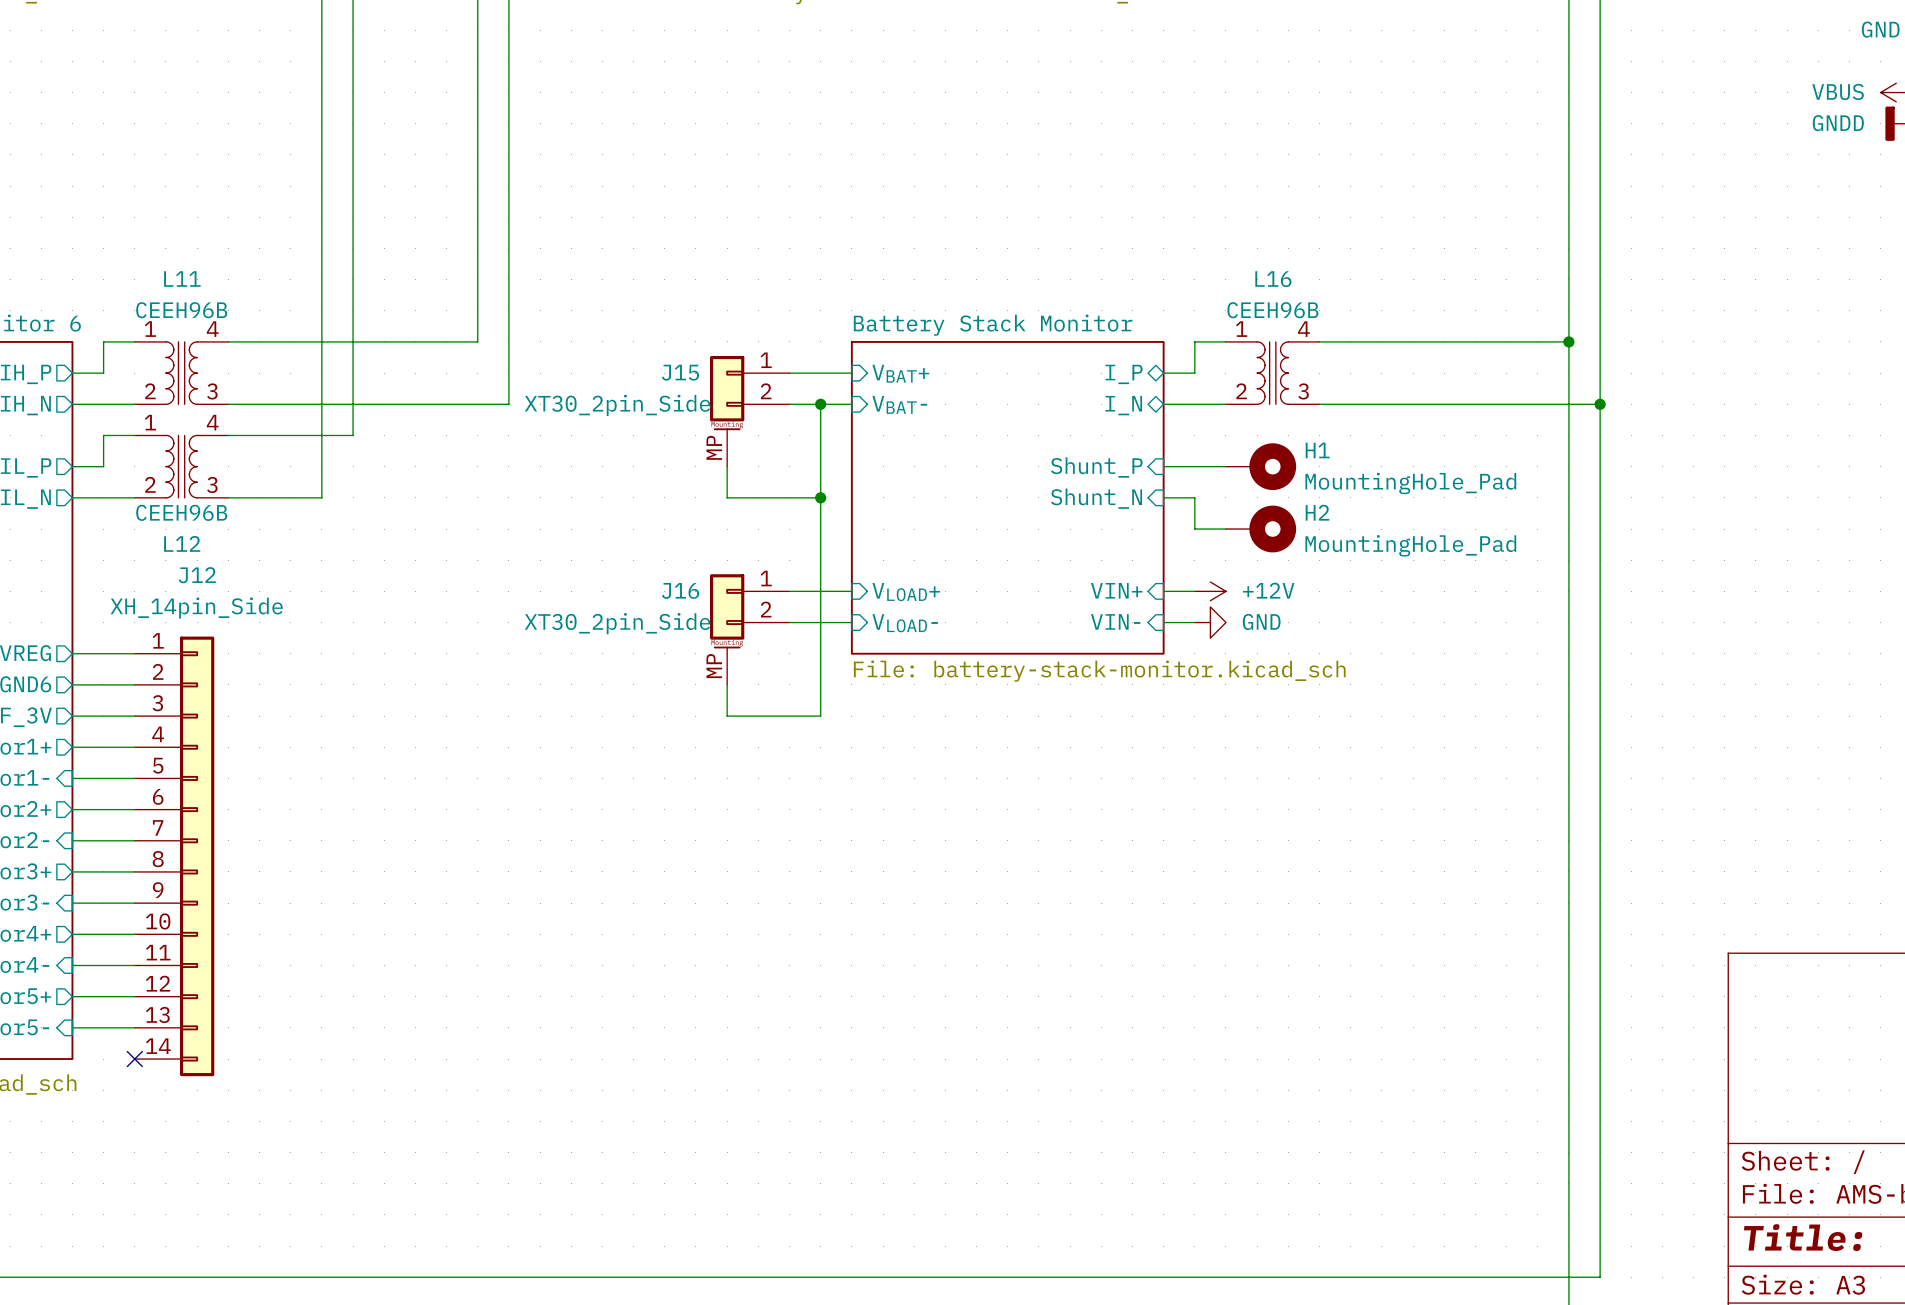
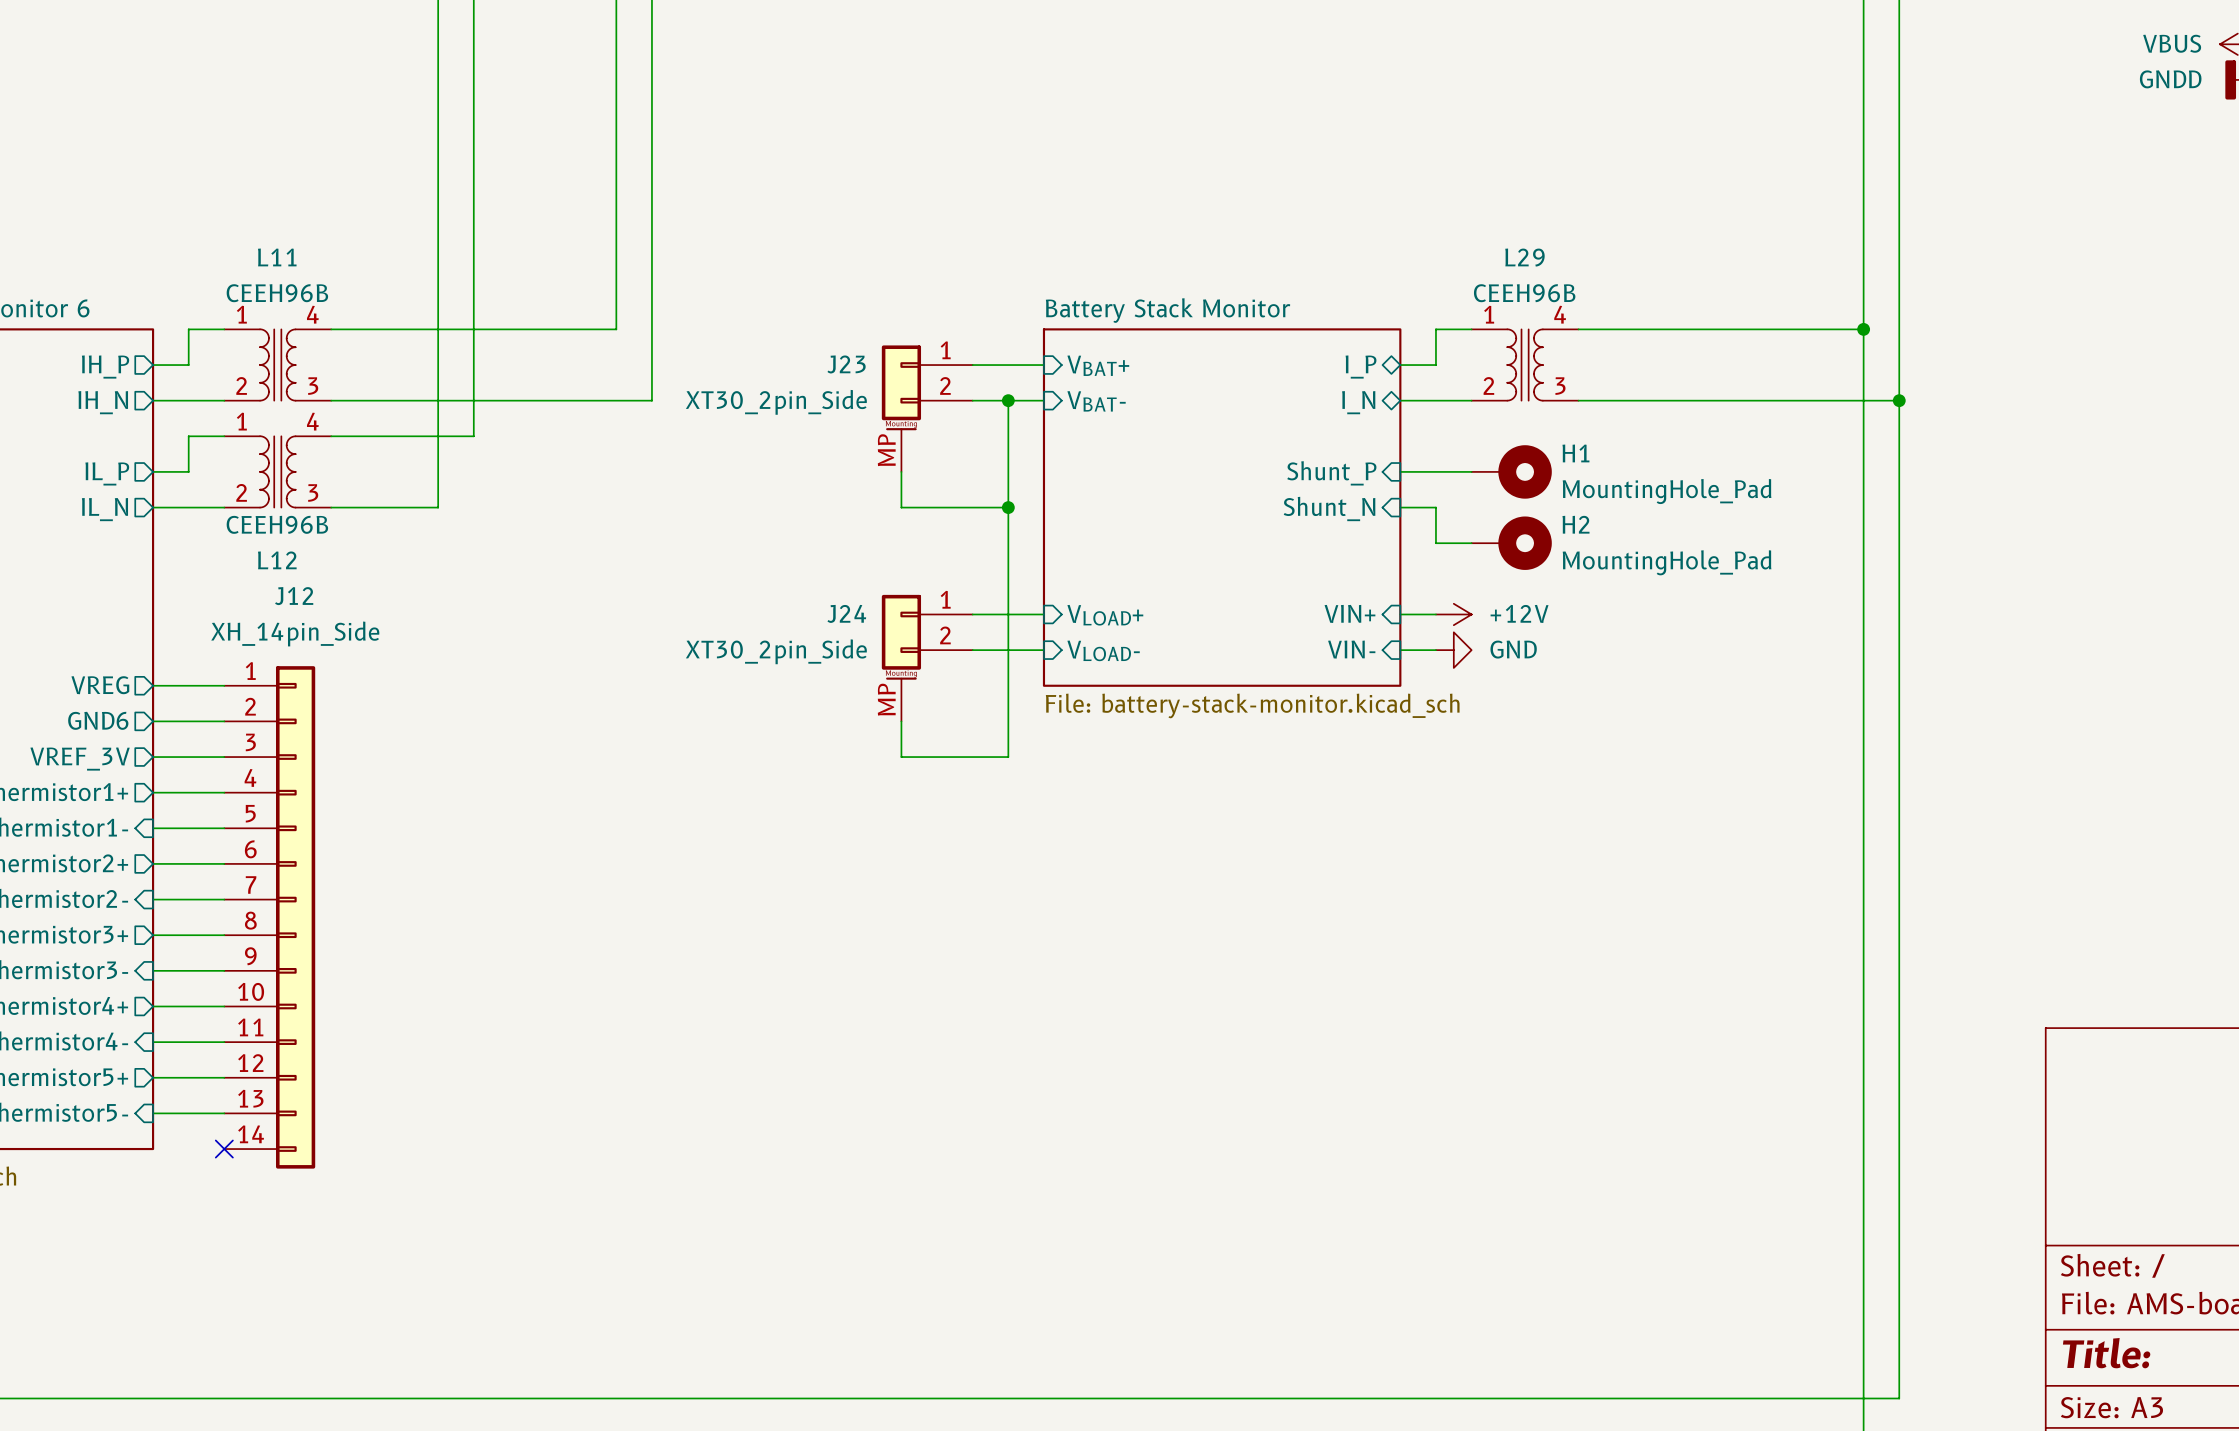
L16 name: L16 (1273, 279) -> L29 (1524, 257)
J15 name: J15 (680, 372) -> J23 (846, 364)
J16 name: J16 (680, 590) -> J24 (846, 613)

